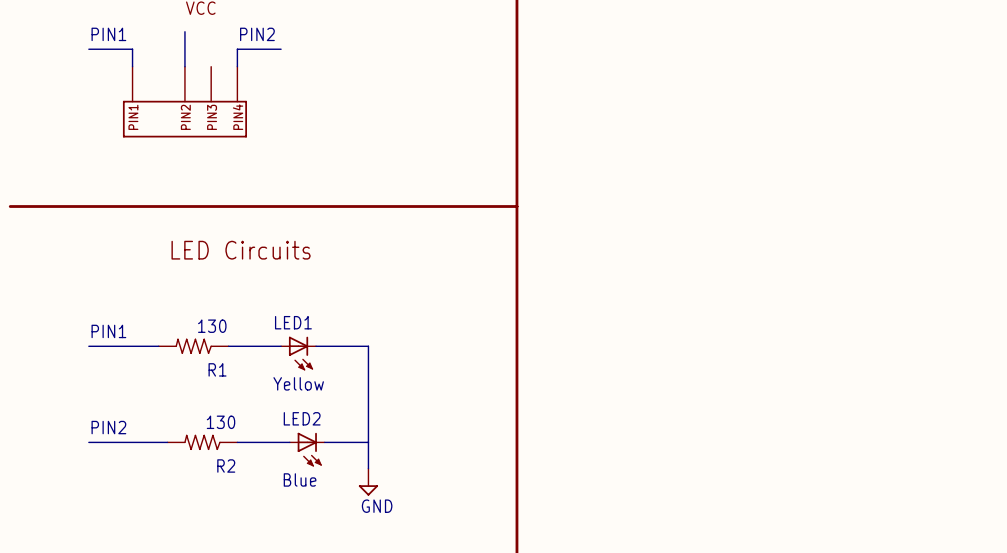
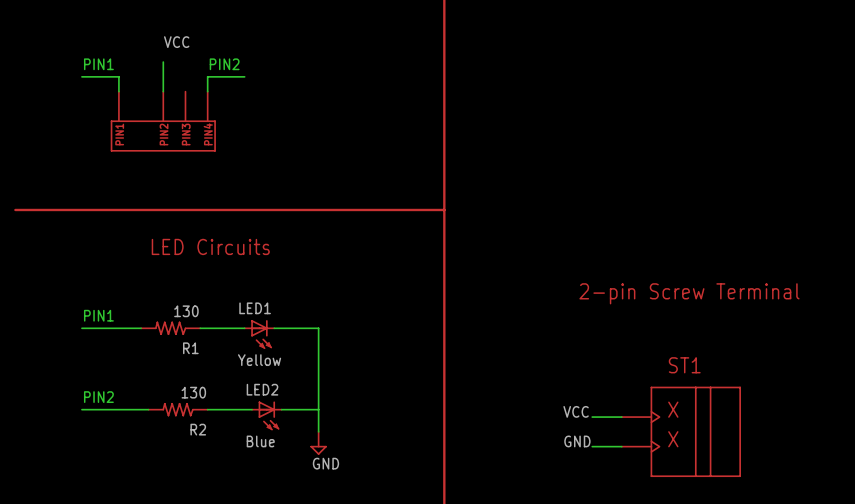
text: none -> 2-pin Screw Terminal (689, 293)
label: none -> VCC (576, 411)
wire: none -> (592, 417) (621, 417)
ST1: none -> (681, 431)
label: none -> GND (577, 441)
wire: none -> (592, 446) (621, 446)

